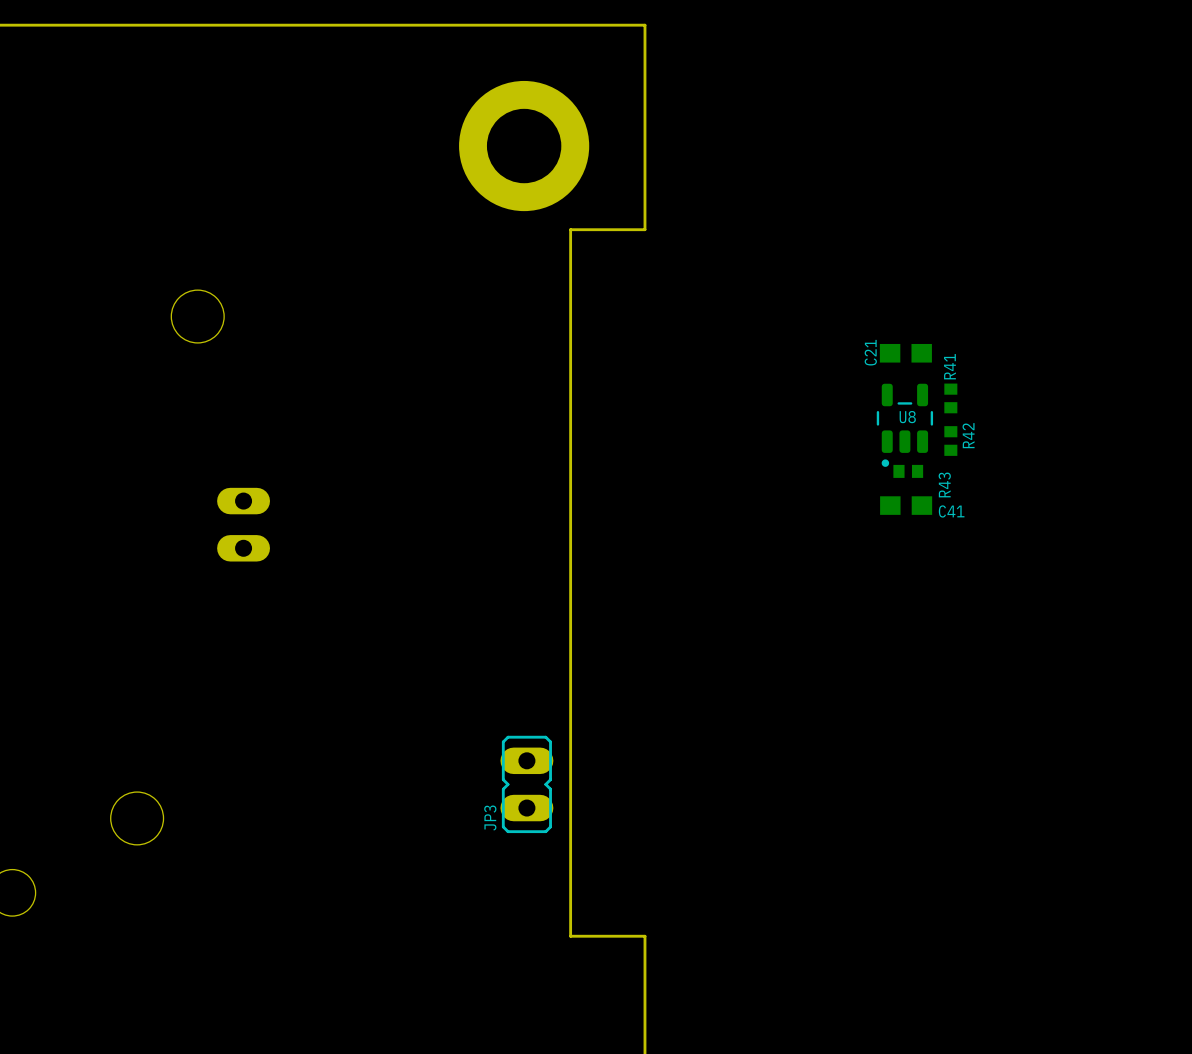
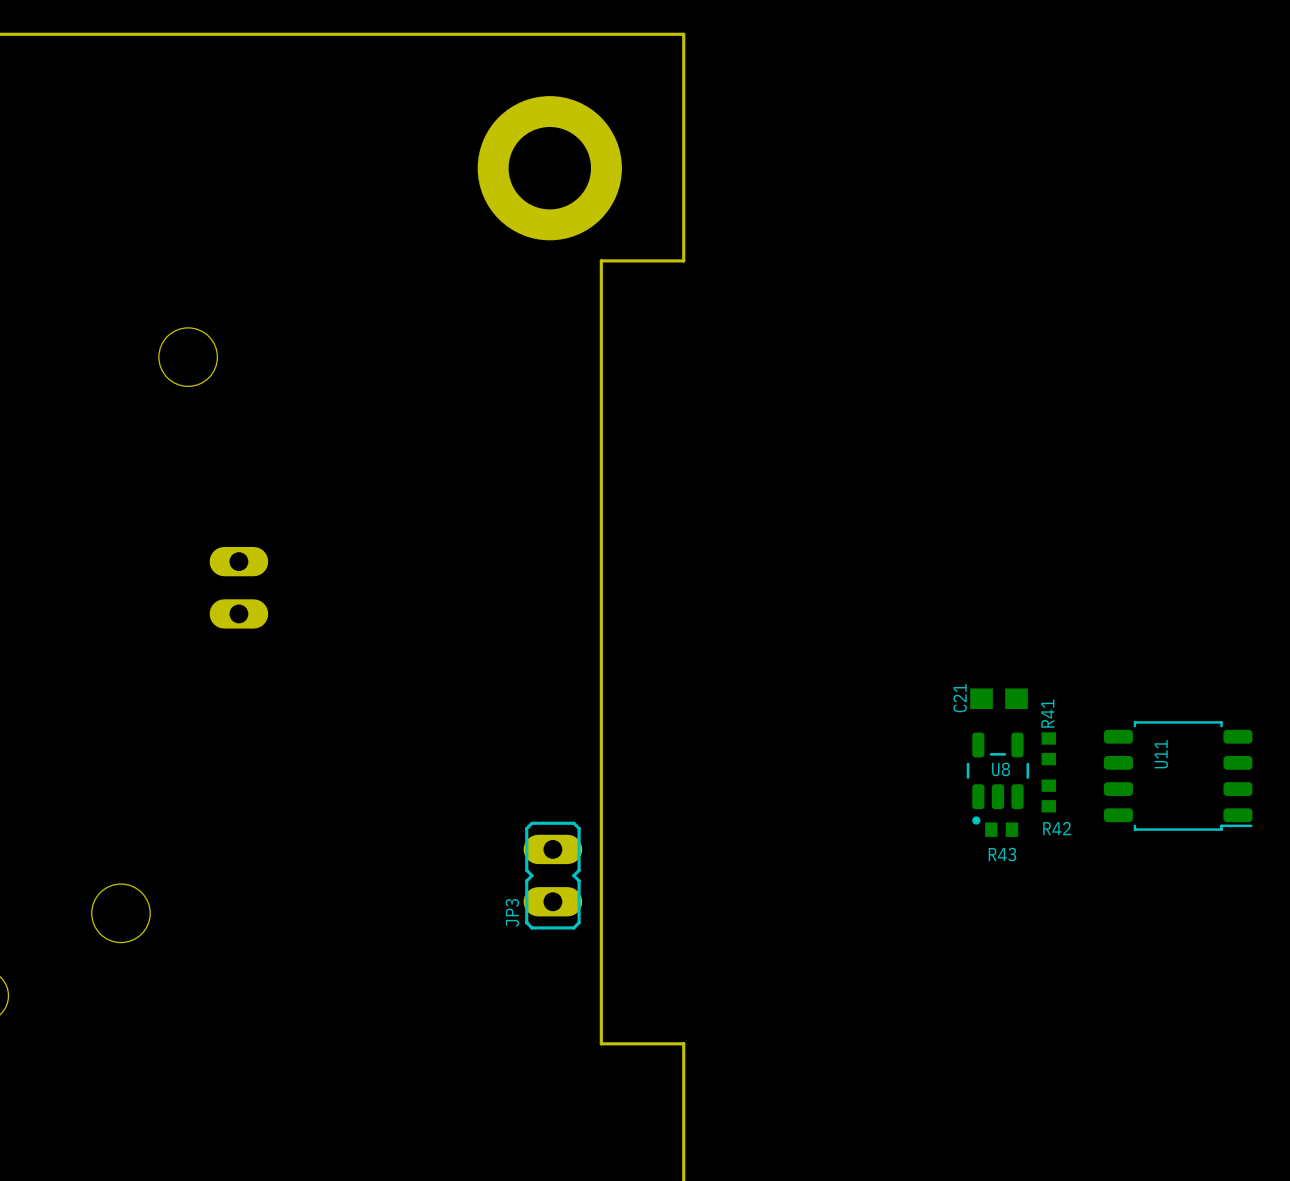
C21 position: (905, 353) -> (999, 698)
R41 position: (950, 398) -> (1048, 748)
U8 position: (904, 425) -> (997, 778)
R42 name rotation: 0° (968, 435) -> 90° clockwise (1057, 828)
R42 name position: R42 (968, 435) -> R42 (1057, 828)
R42 position: (950, 441) -> (1048, 795)
R43 position: (908, 471) -> (1001, 829)
R43 name rotation: 0° (944, 484) -> 90° clockwise (1002, 854)
R43 name position: R43 (944, 484) -> R43 (1002, 854)
C41: (906, 505) -> none
U11: none -> (1178, 775)

